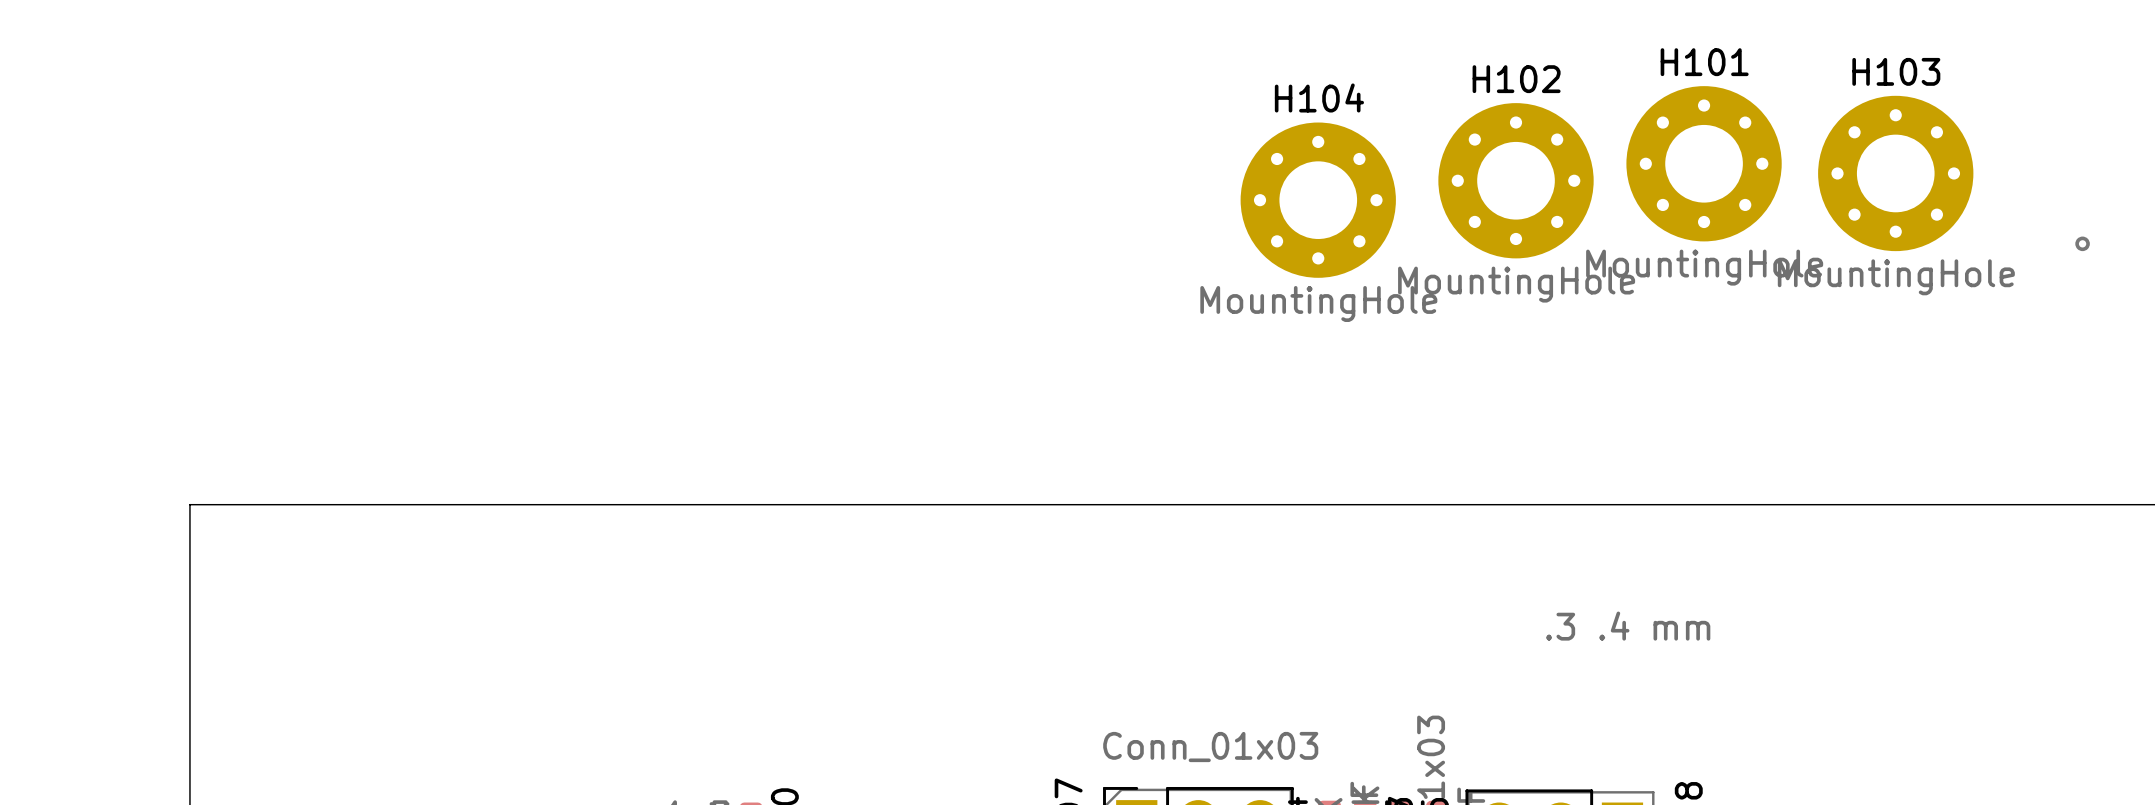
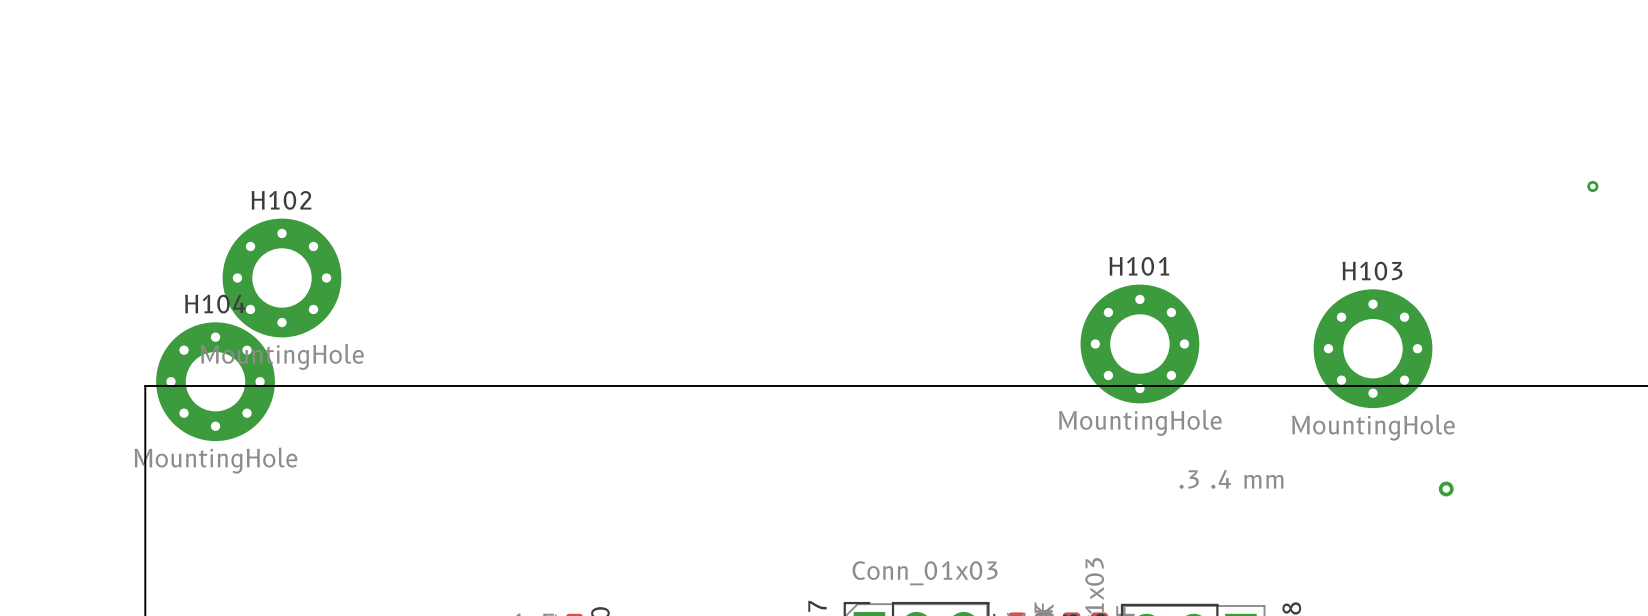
H101 position: (1704, 163) -> (1139, 343)
H103 position: (1895, 173) -> (1373, 348)
H102 position: (1516, 180) -> (282, 277)
H104 position: (1318, 200) -> (215, 381)
via: none -> (1446, 489)

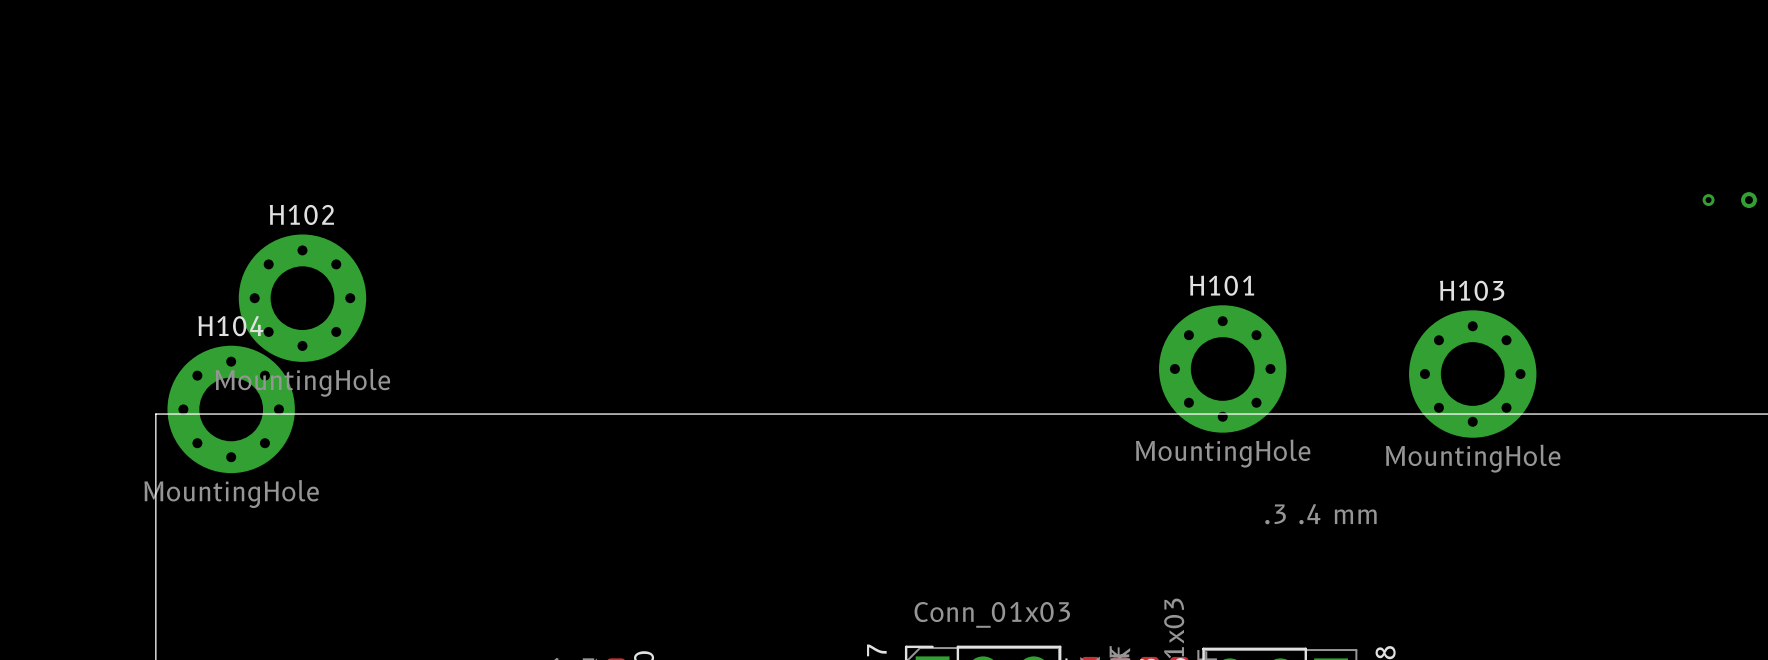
via: none -> (1749, 200)
via: (1446, 489) -> none

